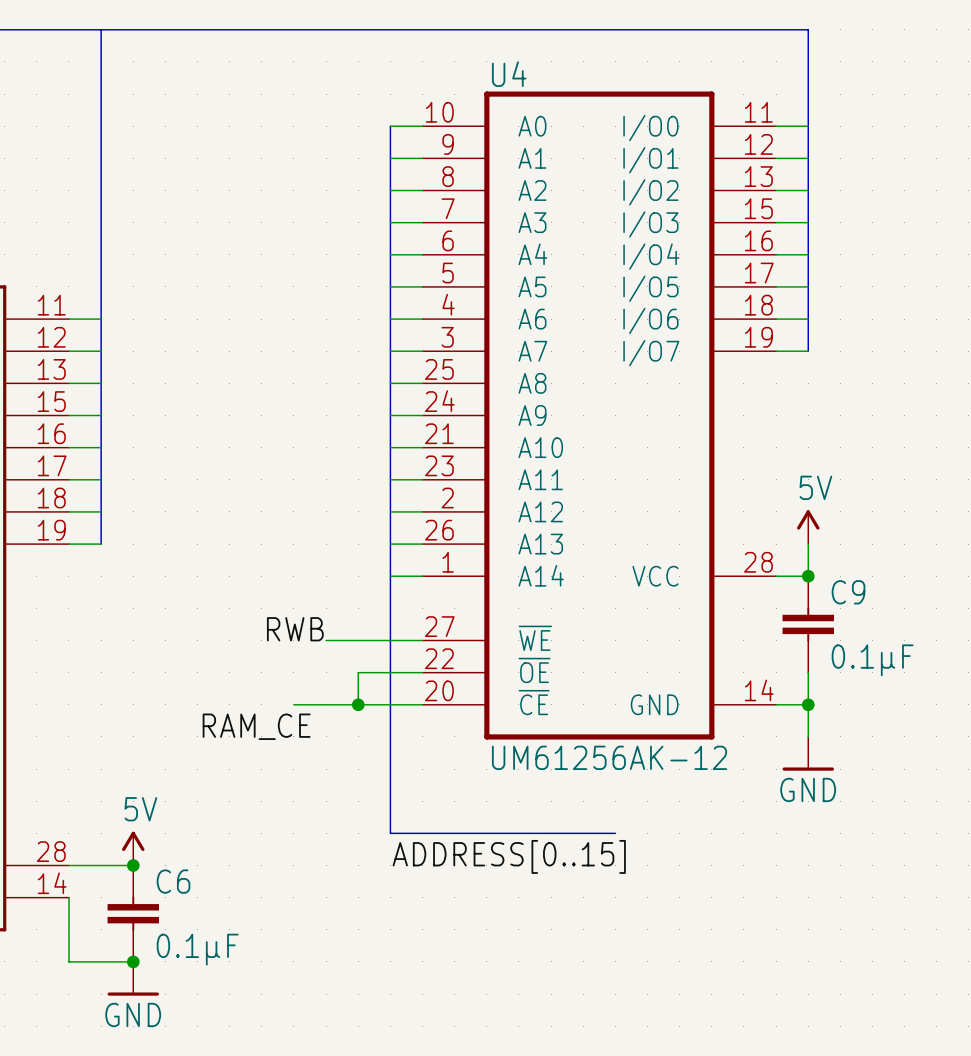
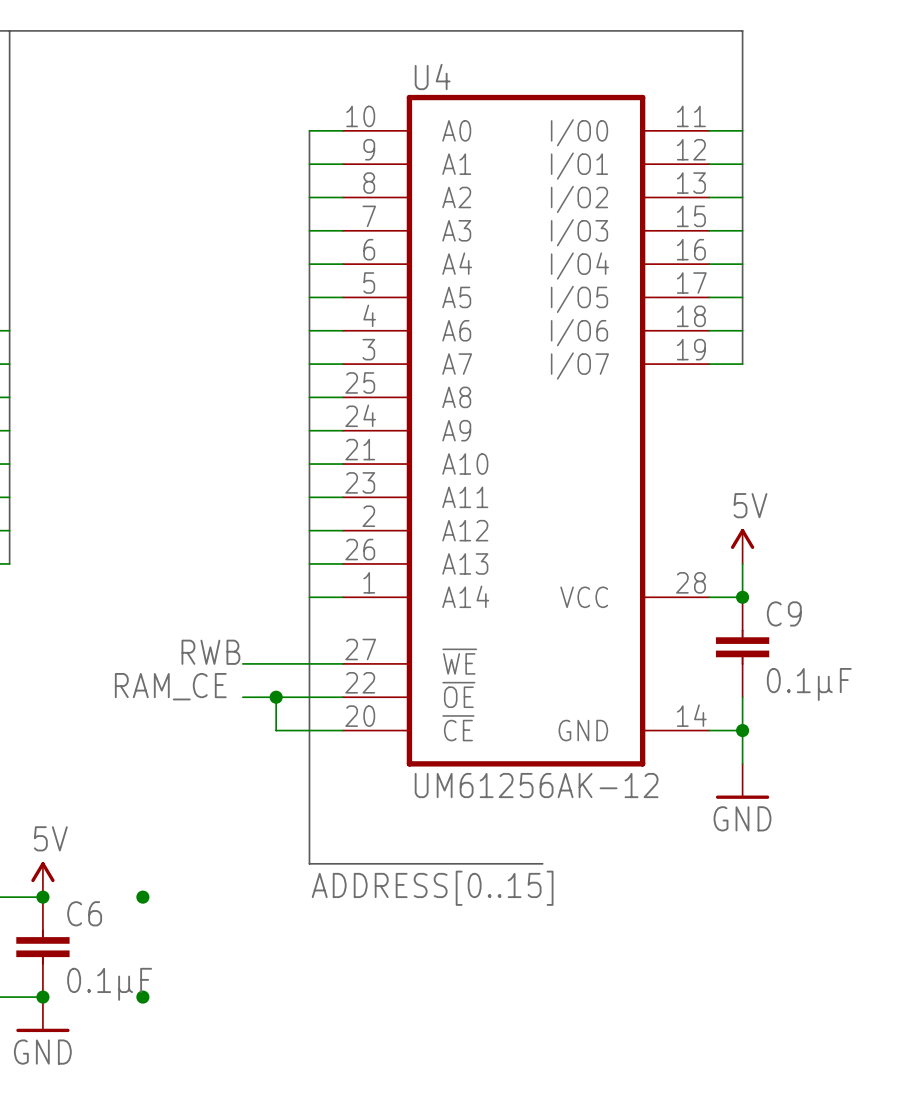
wire: none -> (242, 697) (276, 697)
wire: (293, 704) (358, 704) -> none
junction position: (358, 704) -> (276, 697)
label position: RAM_CE (256, 726) -> RAM_CE (170, 686)
junction: none -> (142, 897)
junction: none -> (142, 997)

